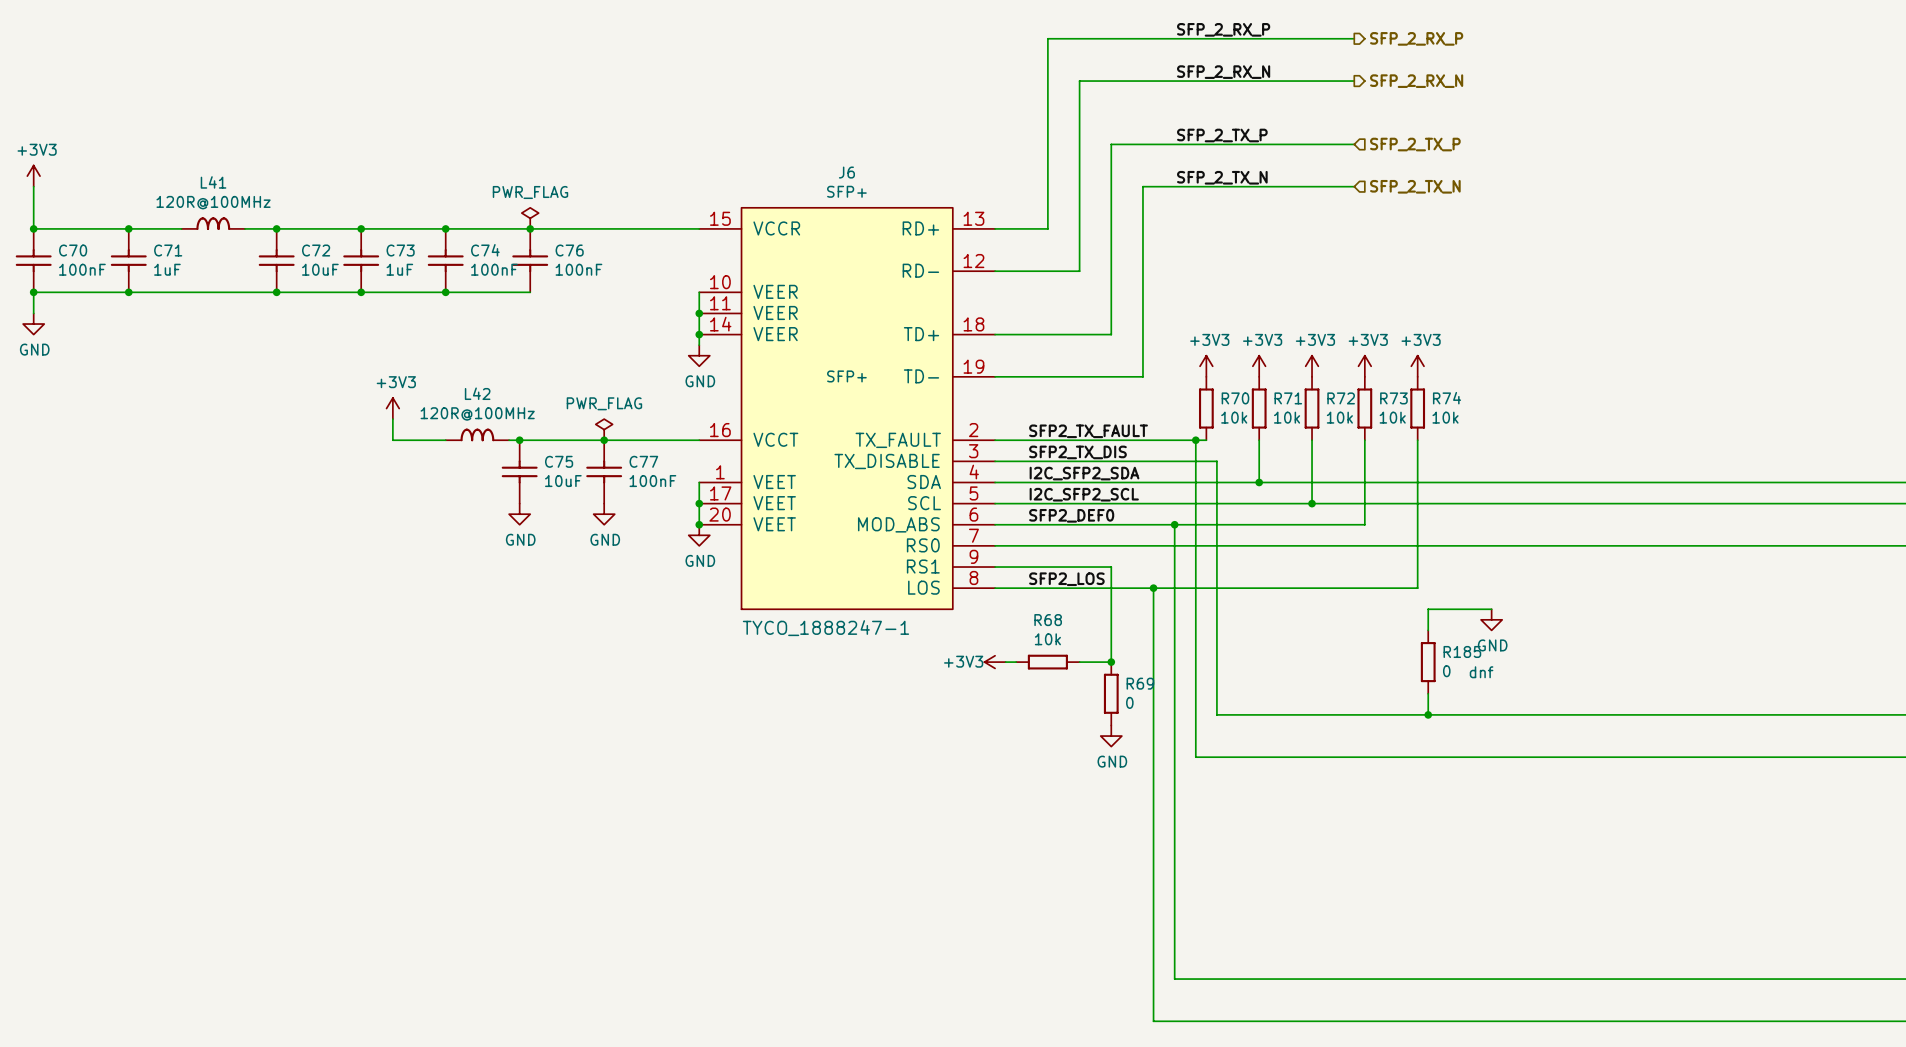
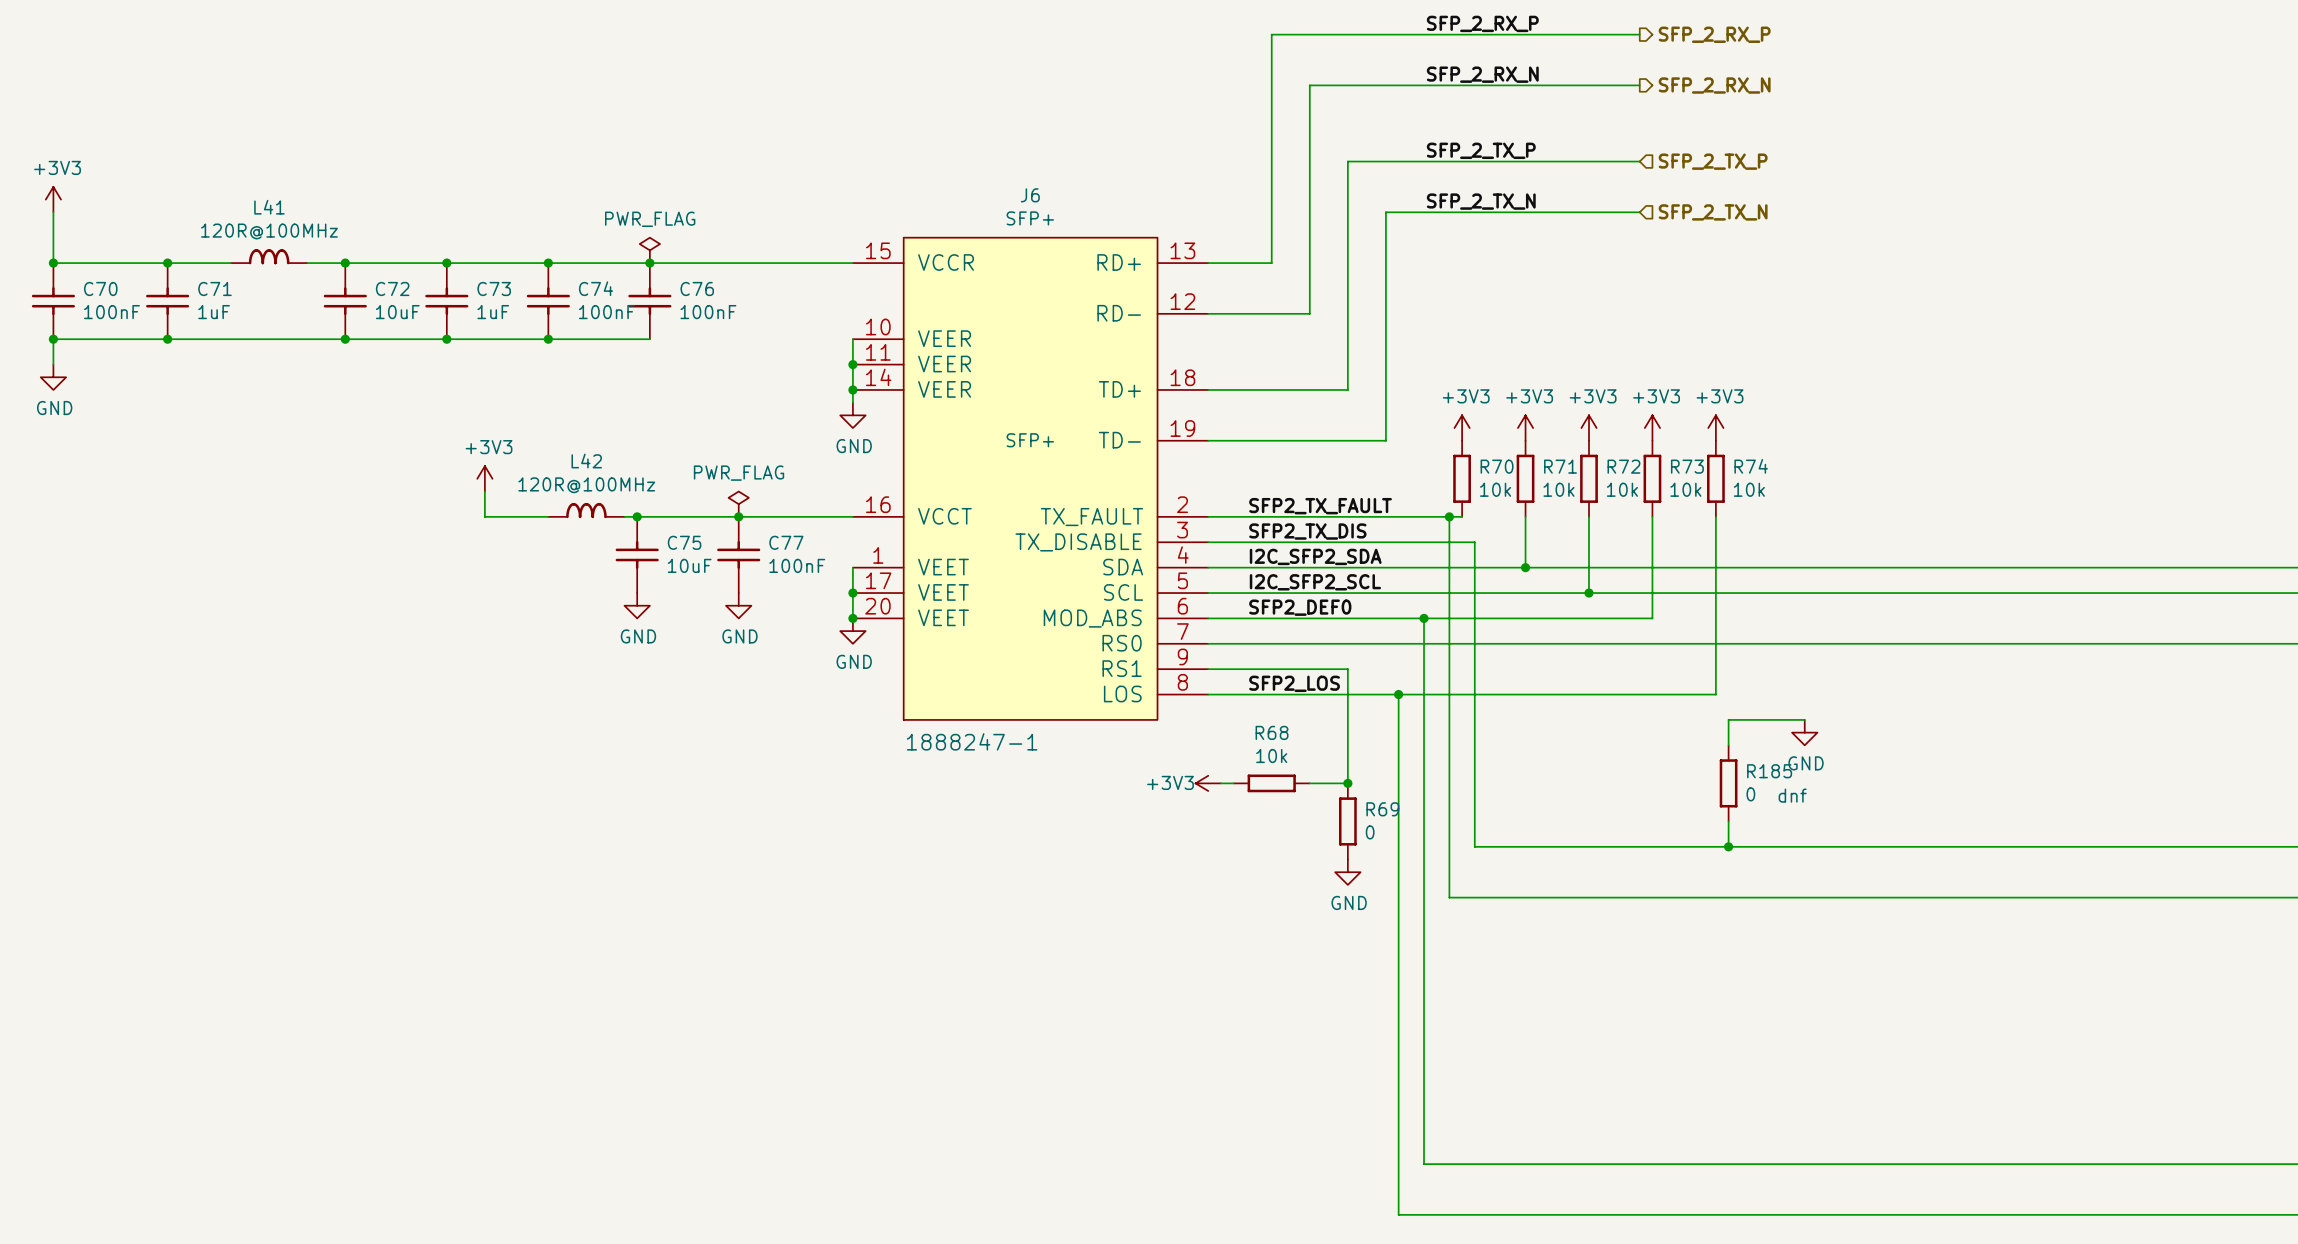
J6 value: TYCO_1888247-1 (825, 628) -> 1888247-1 (972, 741)

